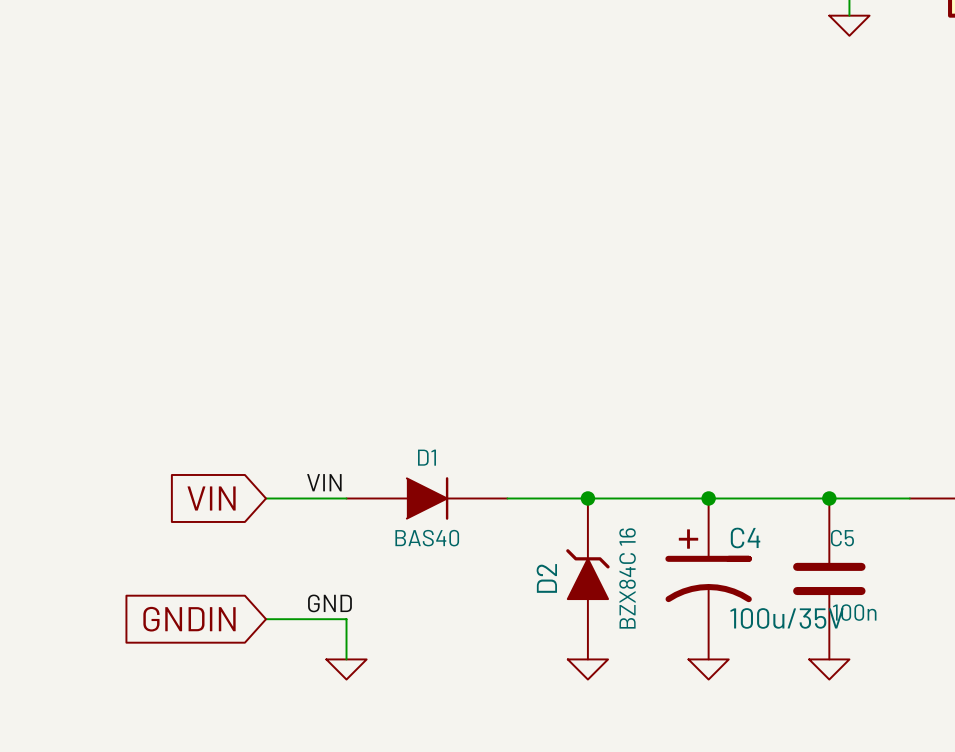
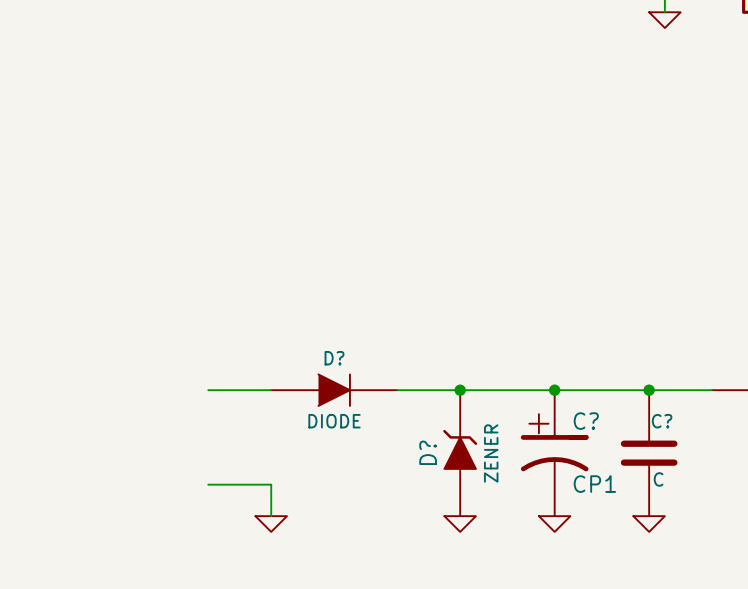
D1 name: D1 (426, 457) -> D? (334, 358)
label: VIN (324, 482) -> none
global label: VIN (211, 498) -> none
C4 name: C4 (745, 537) -> C? (586, 421)
D1 value: BAS40 (427, 538) -> DIODE (334, 421)
C5 name: C5 (842, 538) -> C? (662, 421)
D2 name: D2 (546, 578) -> D? (428, 452)
D2 value: BZX84C 16 (627, 578) -> ZENER (491, 453)
label: GND (329, 603) -> none
C5 value: 100n (854, 612) -> C (658, 479)
C4 value: 100u/35V (787, 618) -> CP1 (594, 484)
global label: GNDIN (189, 619) -> none

